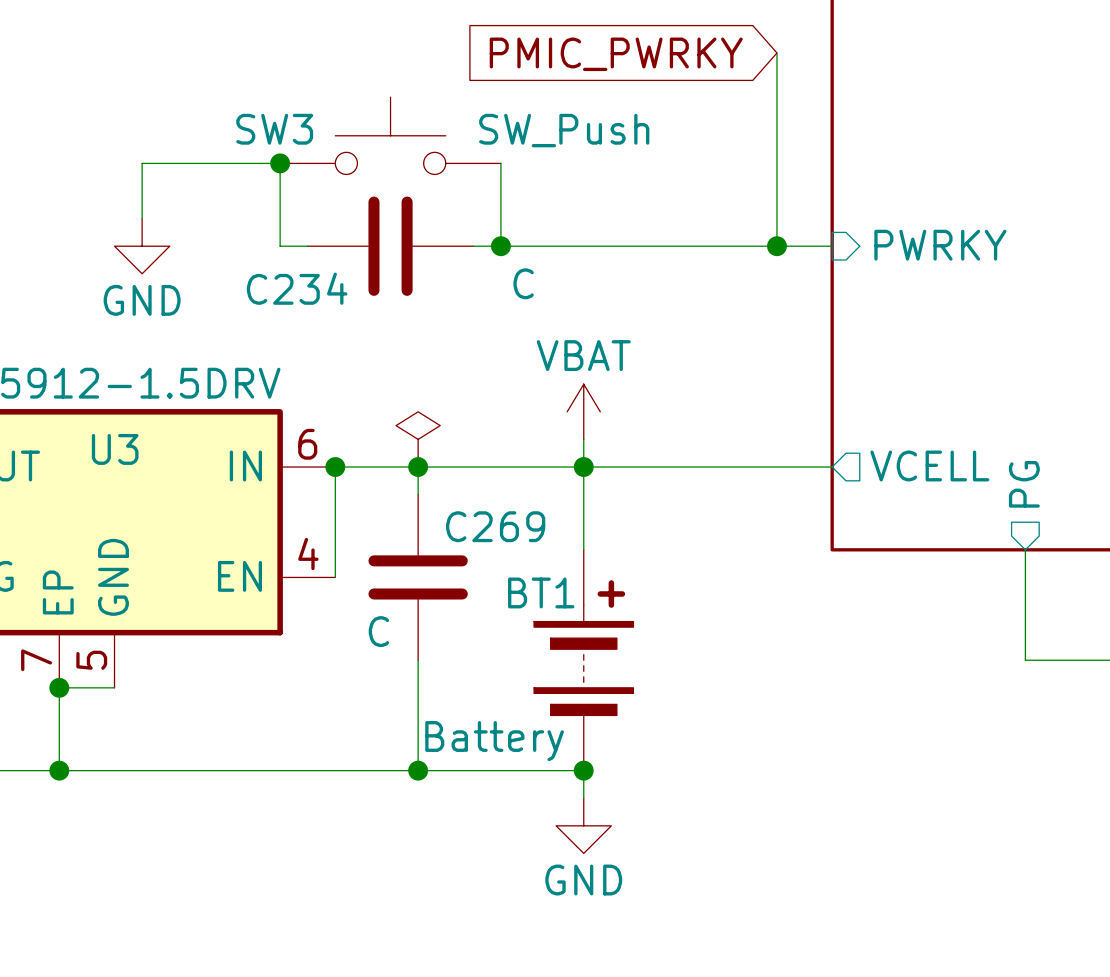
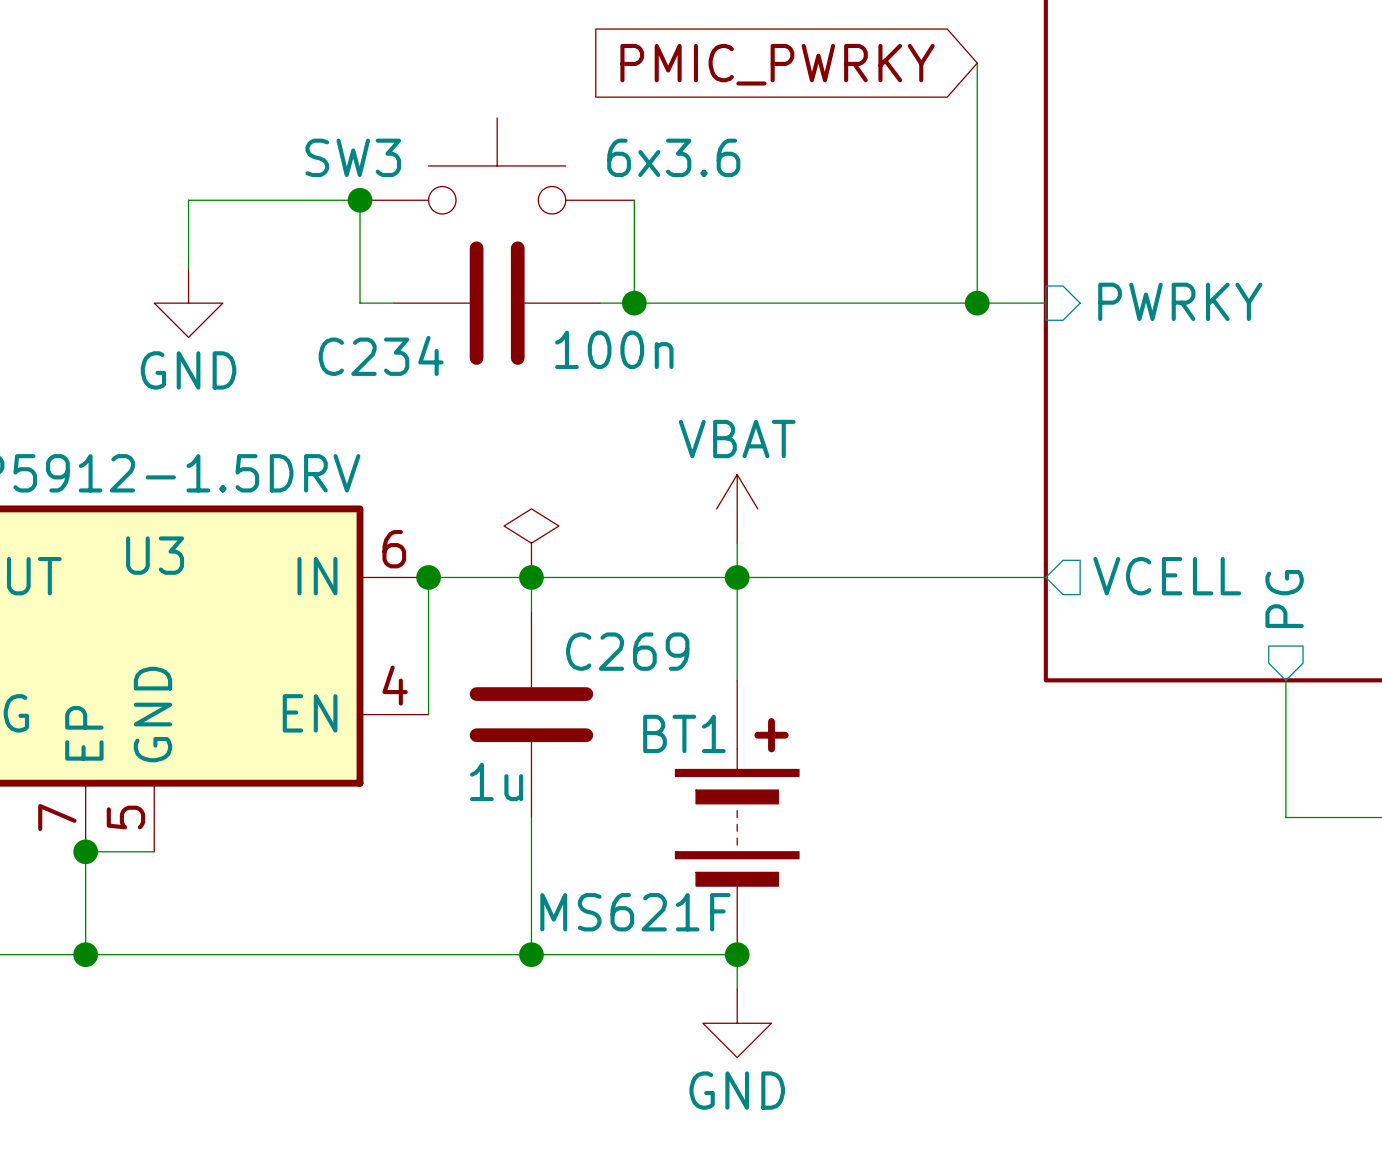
SW3 value: SW_Push (564, 130) -> 6x3.6 (673, 157)
C234 value: C (523, 283) -> 100n (614, 349)
C269 value: C (378, 631) -> 1u (496, 781)
BT1 value: Battery (494, 741) -> MS621F (635, 912)

